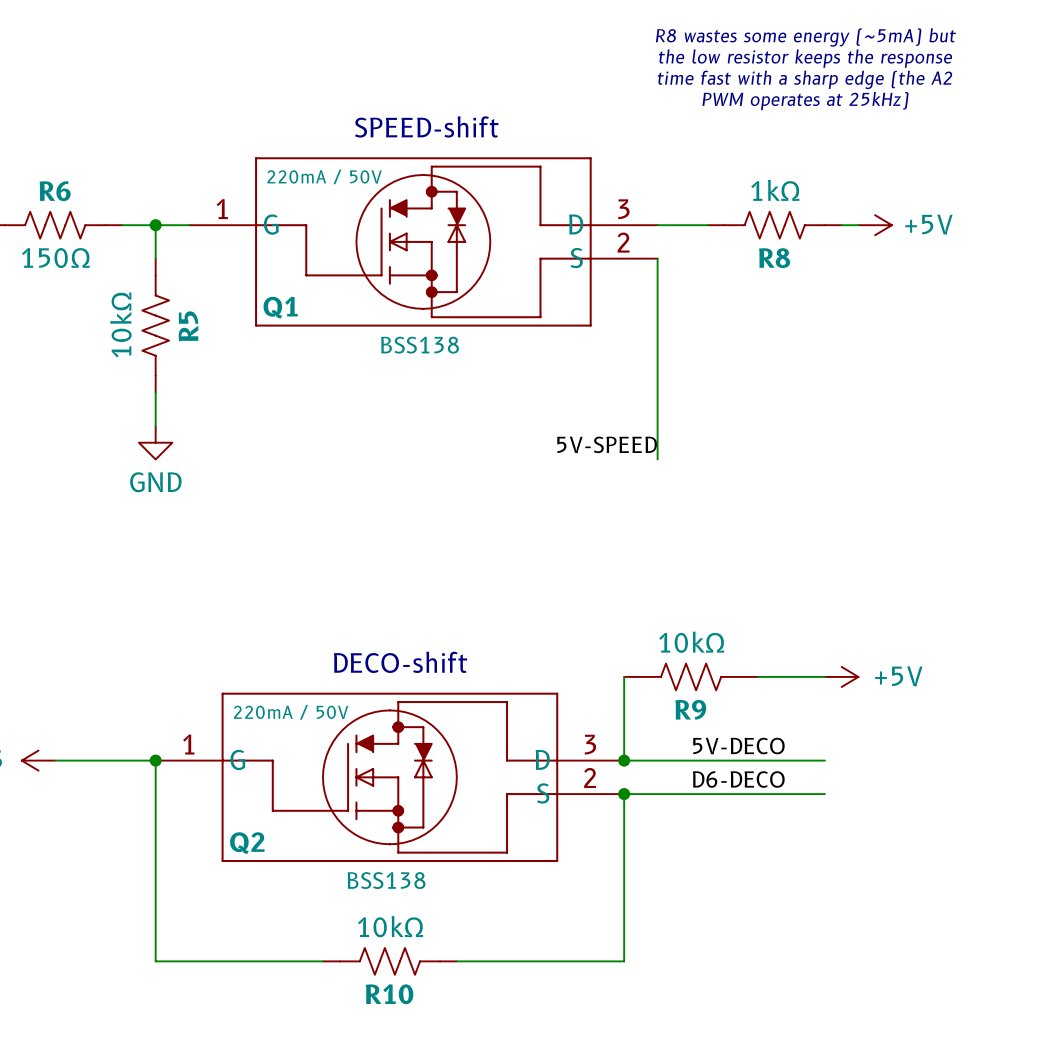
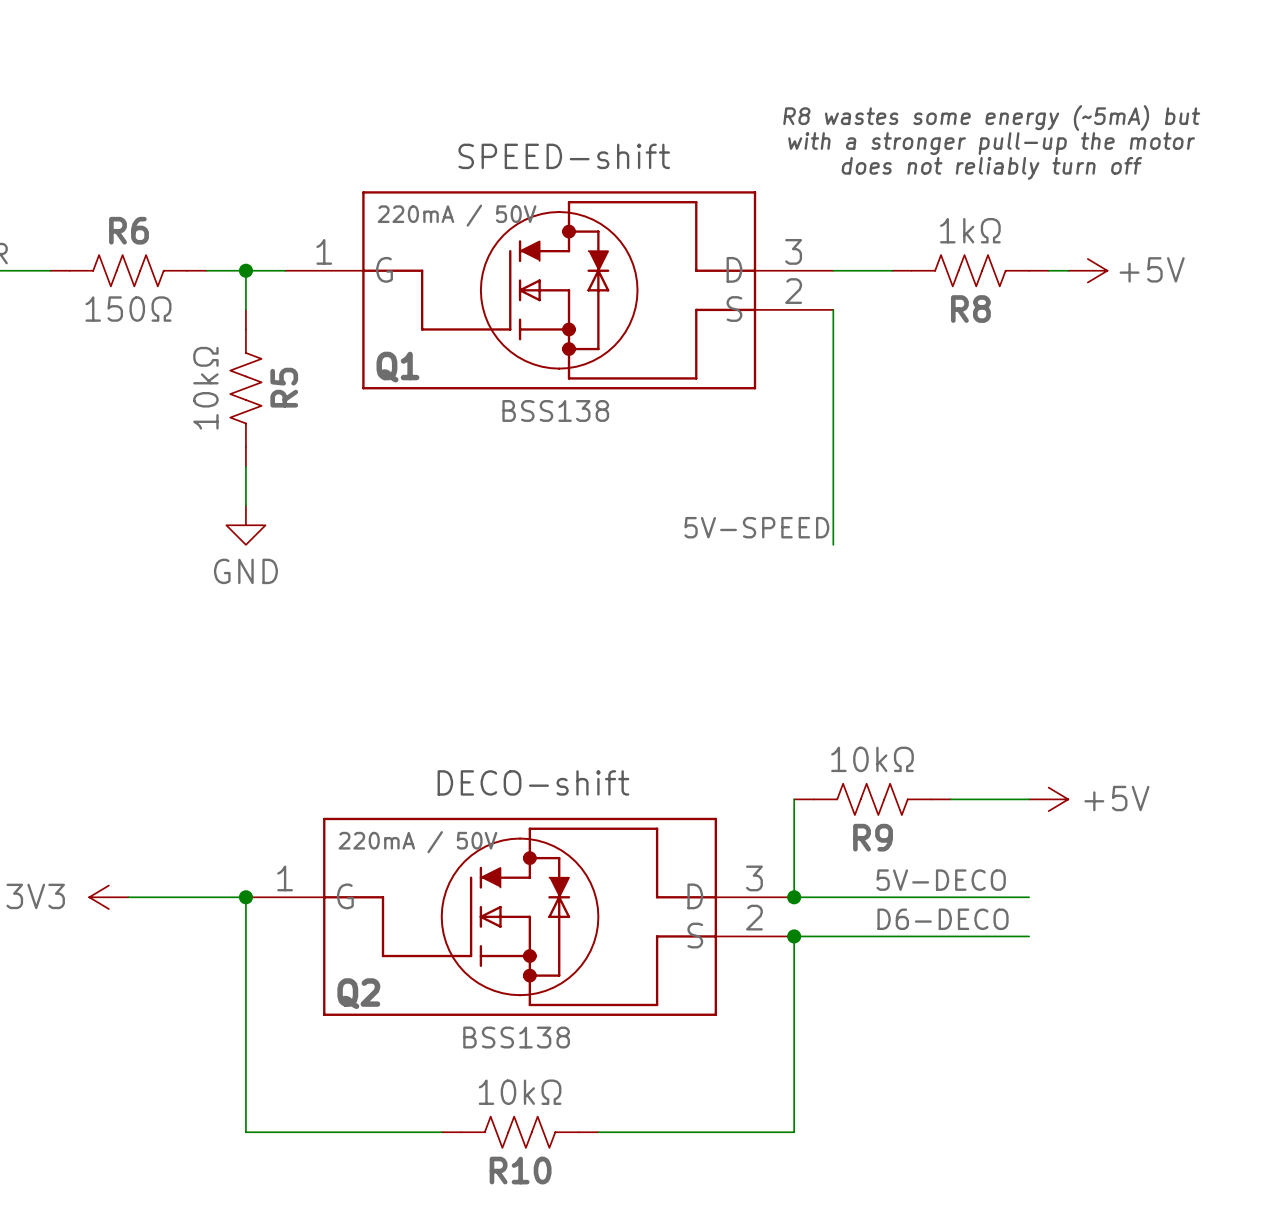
text position: R8 wastes some energy (~5mA) but (805, 37) -> R8 wastes some energy (~5mA) but (991, 118)
text: the low resistor keeps the response (805, 58) -> none
text: time fast with a sharp edge (the A2 (805, 79) -> none
text: PWM operates at 25kHz) (805, 101) -> none
text: none -> with a stronger pull-up the motor (991, 143)
text: none -> does not reliably turn off (991, 168)

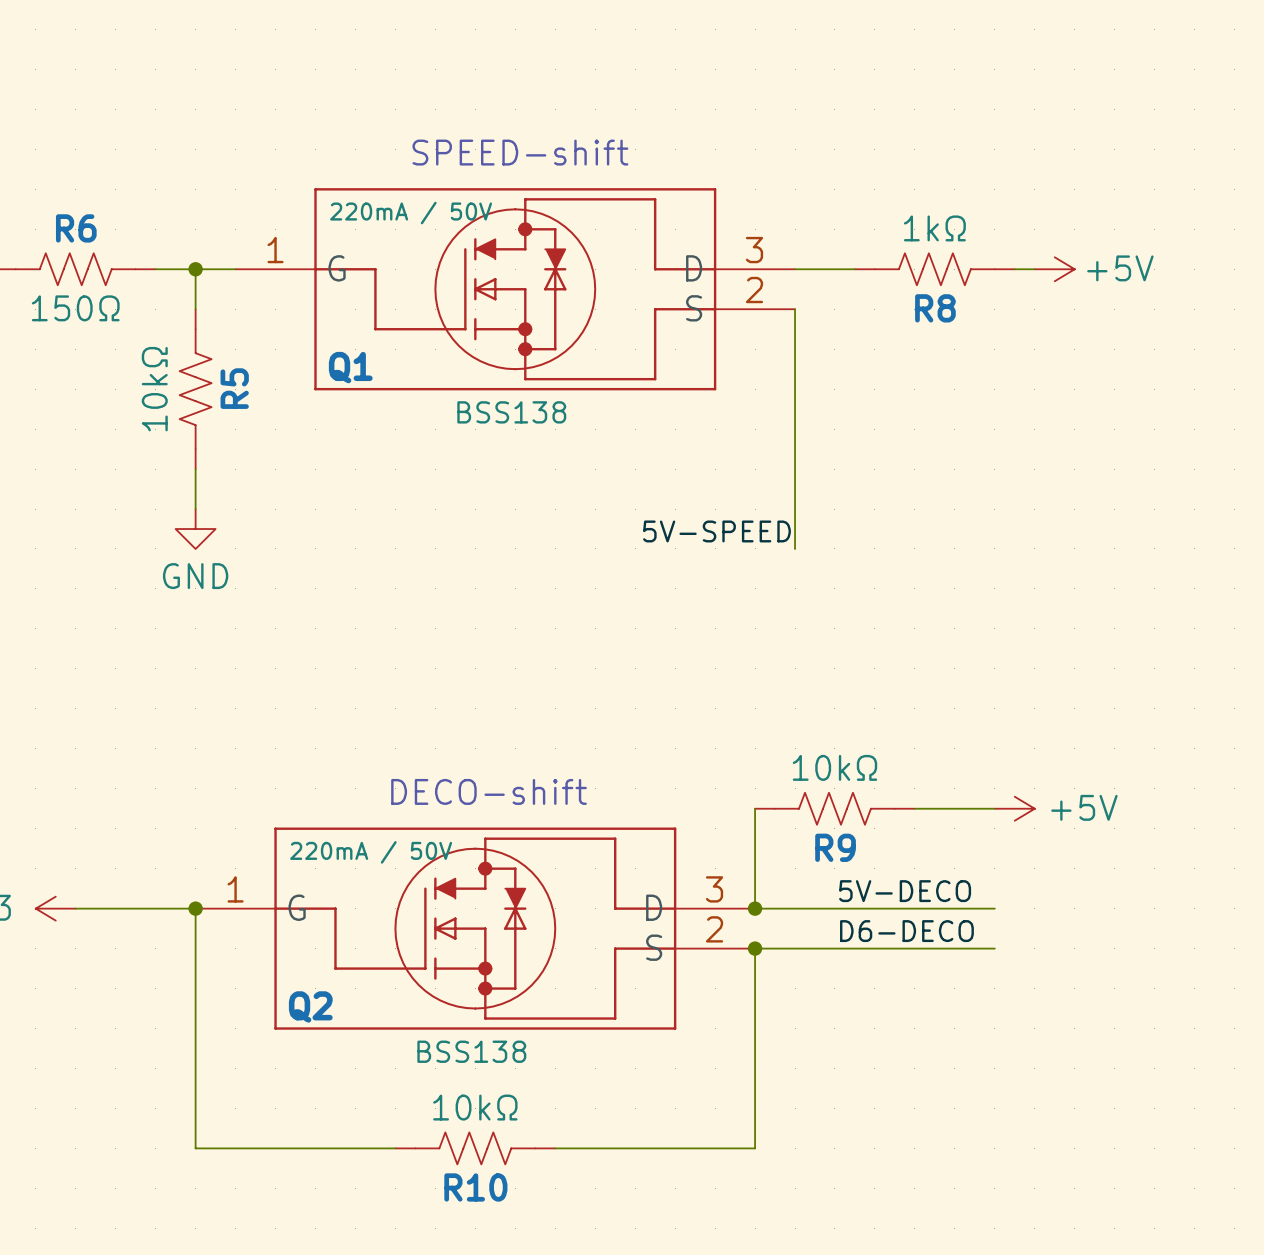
text: R8 wastes some energy (~5mA) but (991, 118) -> none
text: with a stronger pull-up the motor (991, 143) -> none
text: does not reliably turn off (991, 168) -> none

